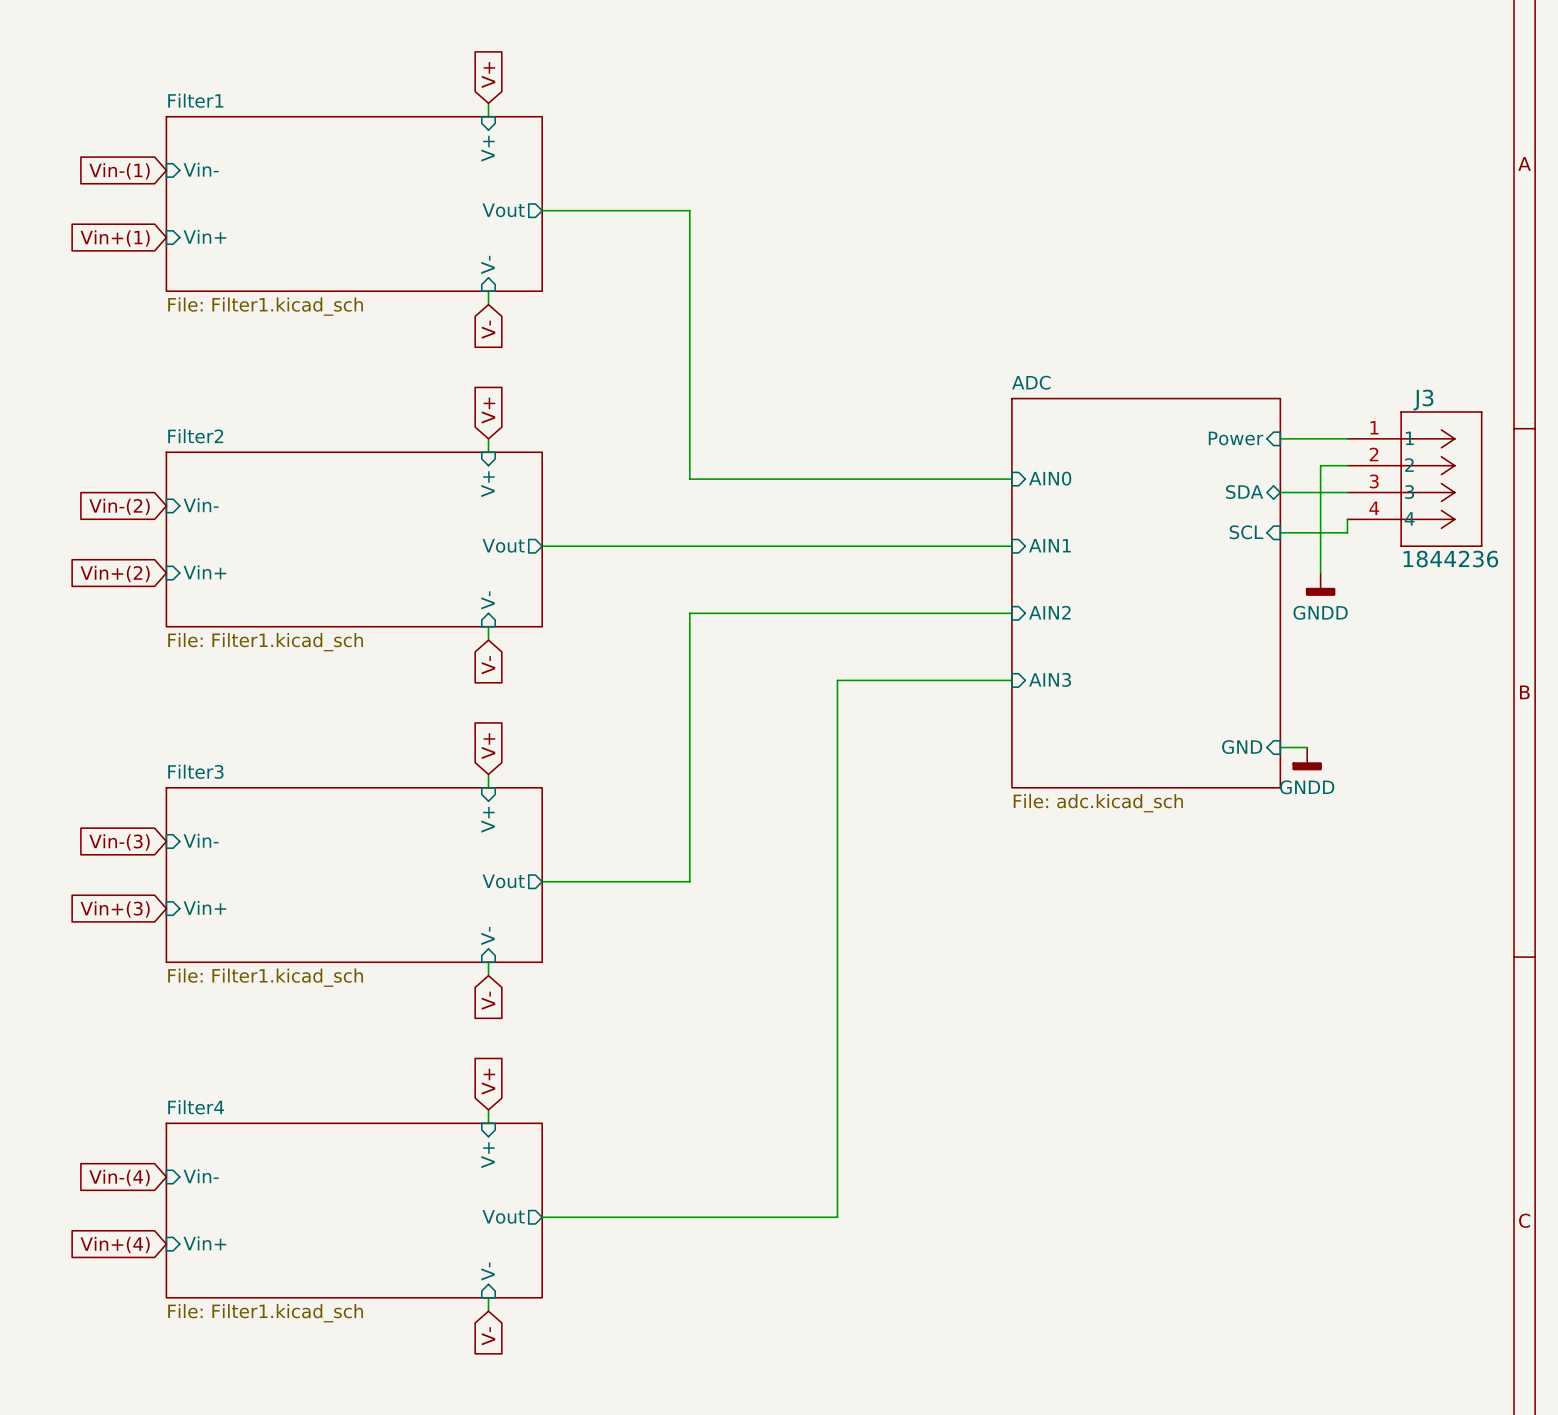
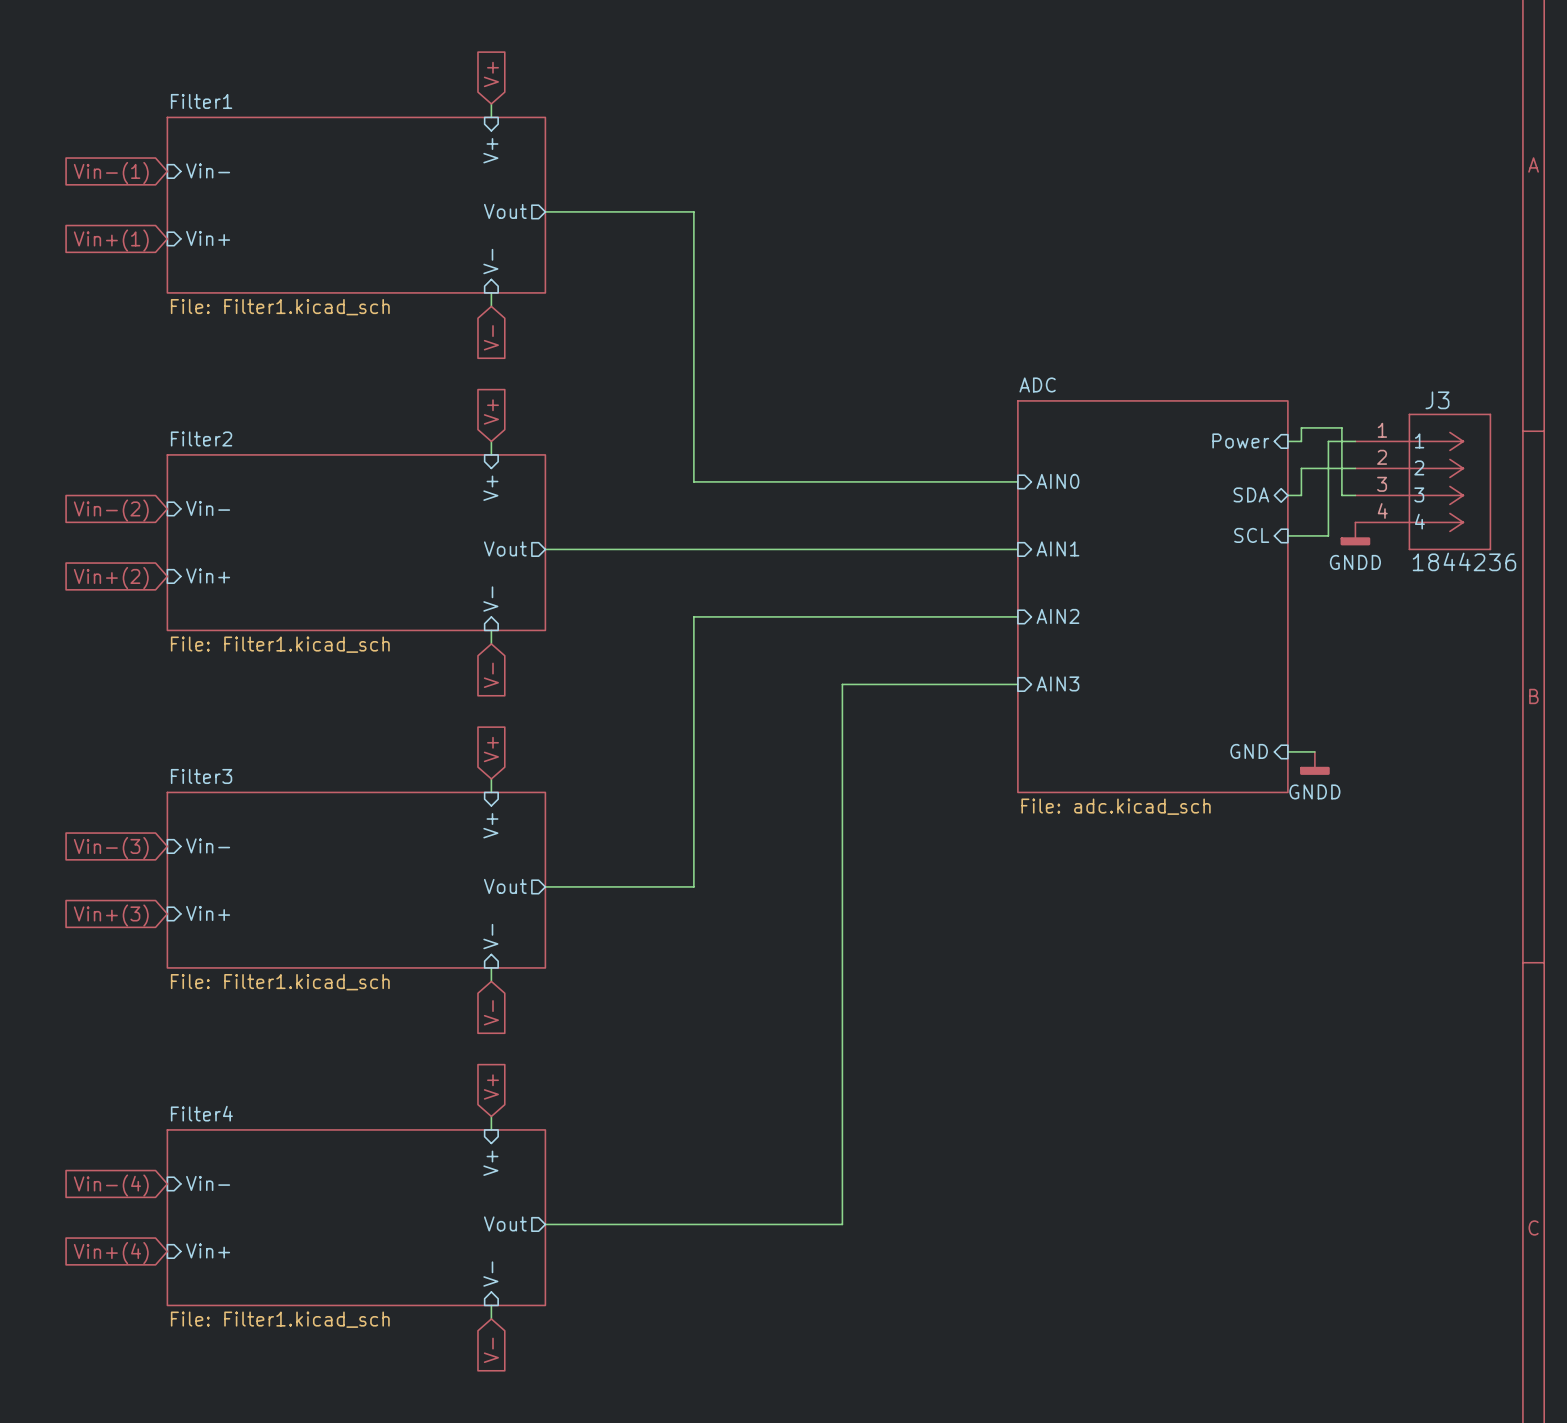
wire: (1293, 438) (1320, 438) -> (1301, 495) (1301, 468) (1328, 468) (1328, 441)
wire: (1293, 492) (1334, 492) -> (1301, 441) (1301, 427) (1341, 427) (1341, 495)
wire: (1347, 519) (1347, 532) (1320, 532) (1320, 573) -> none
power symbol position: GNDD (1320, 584) -> GNDD (1355, 533)

